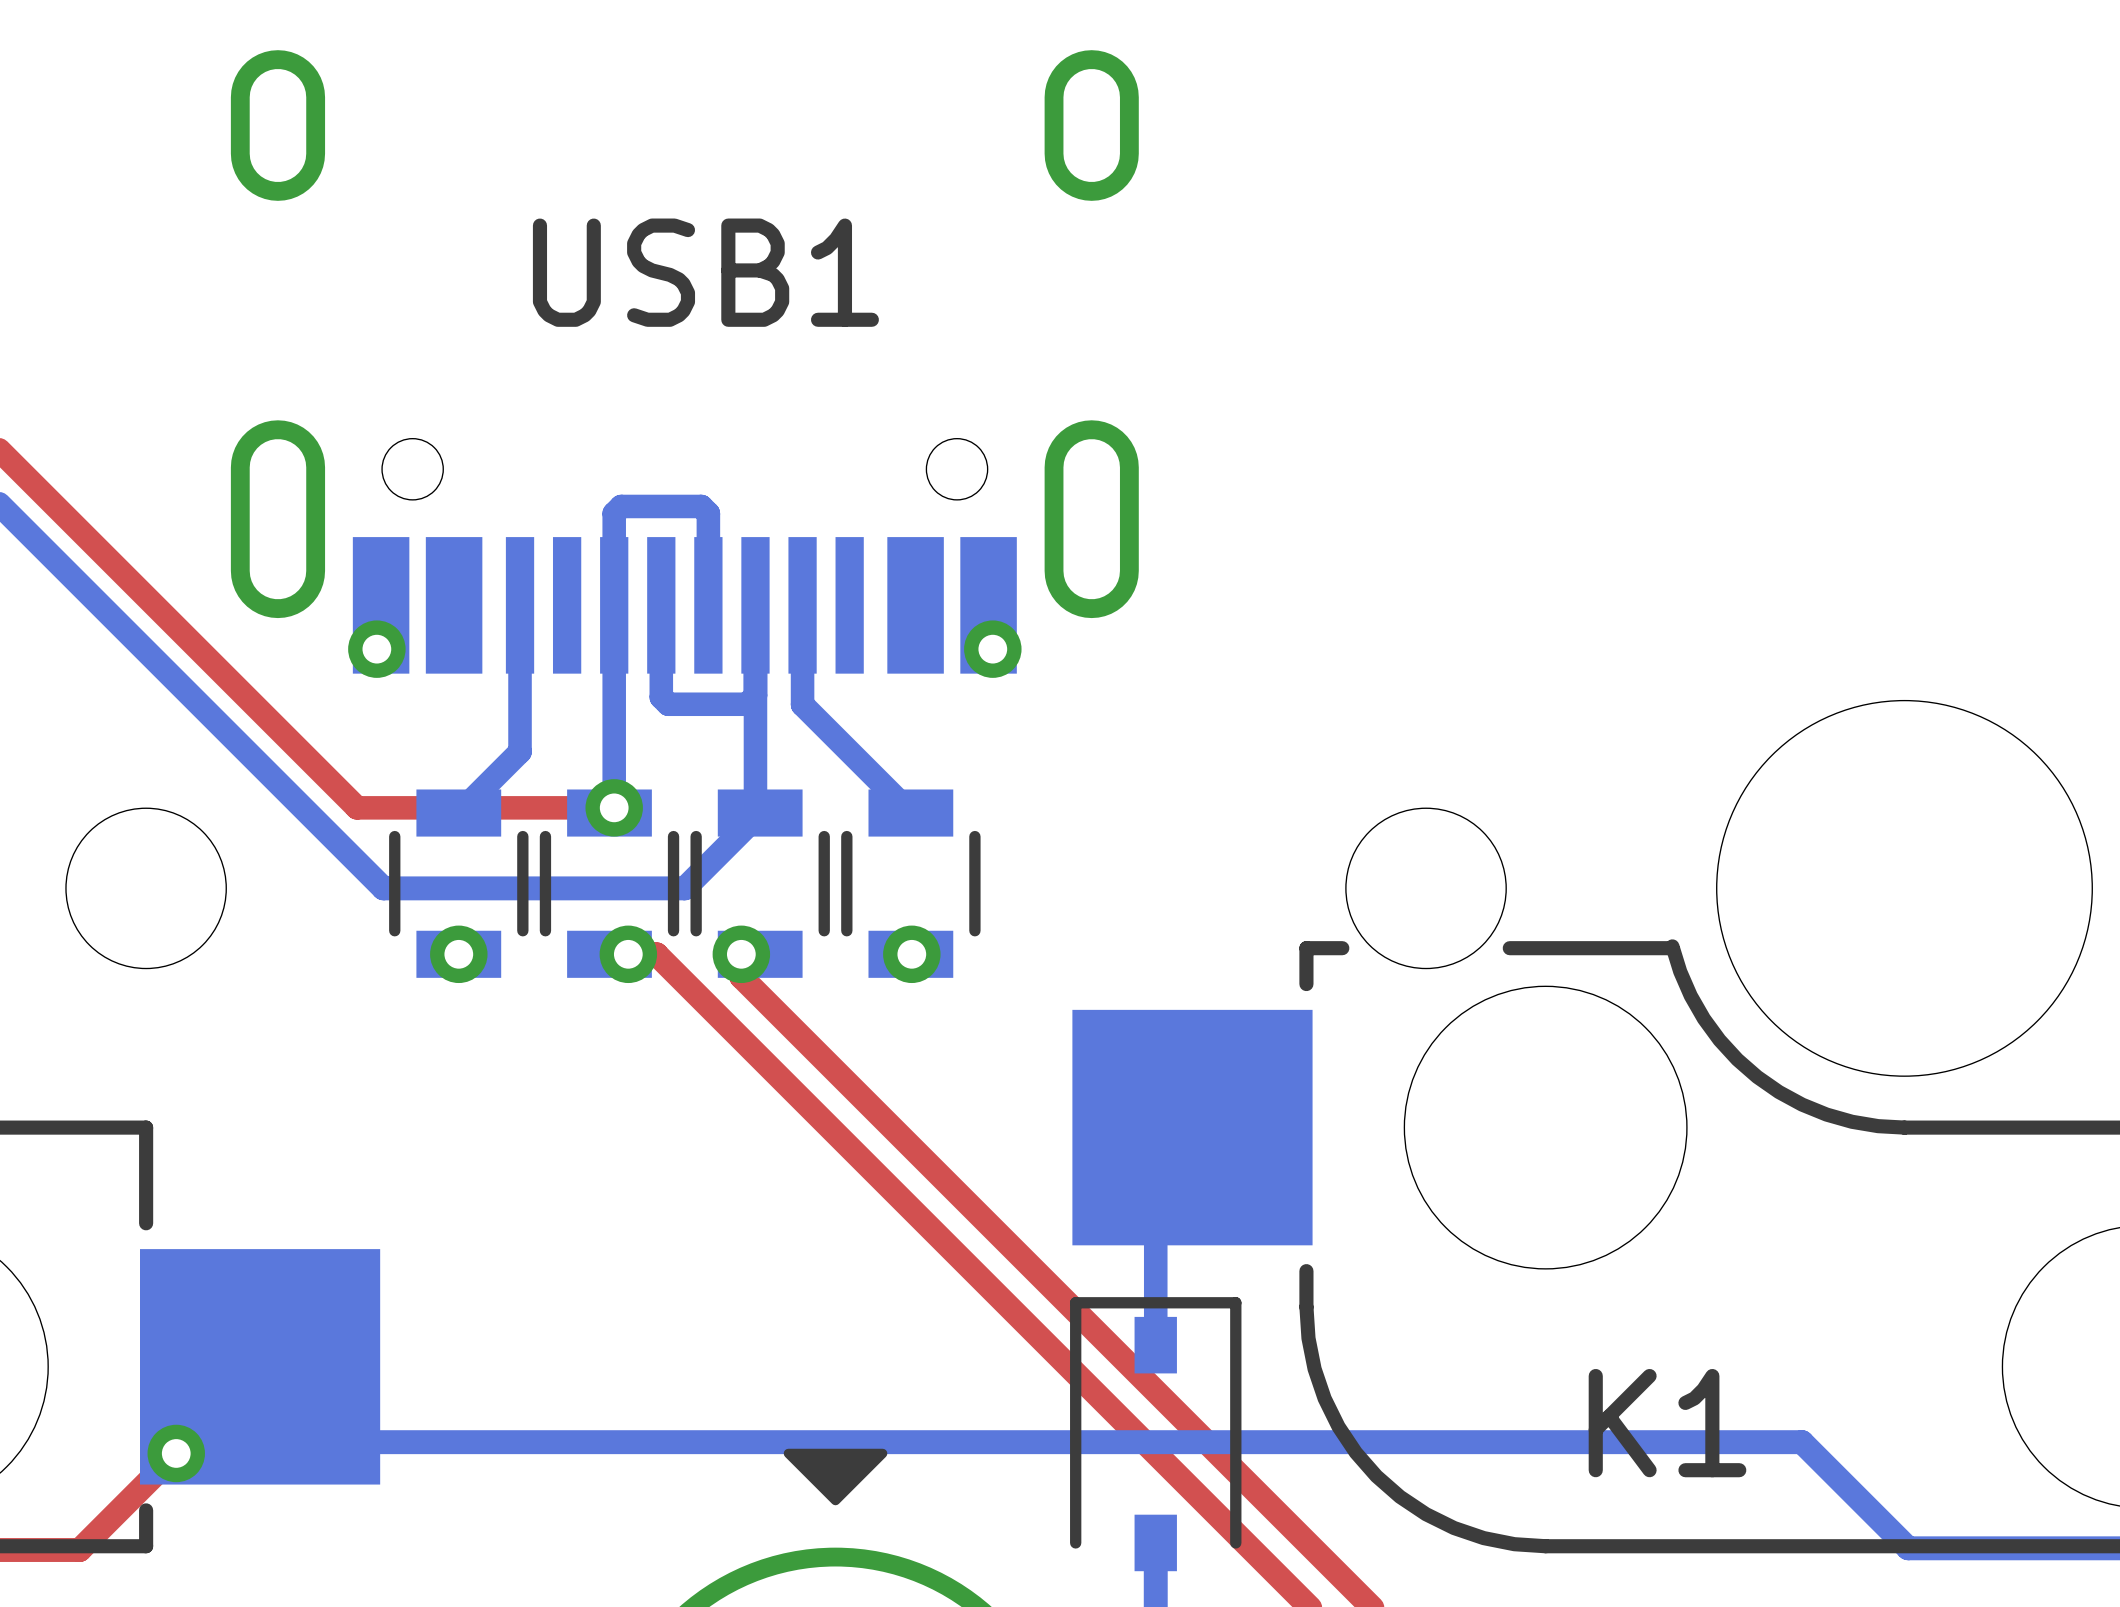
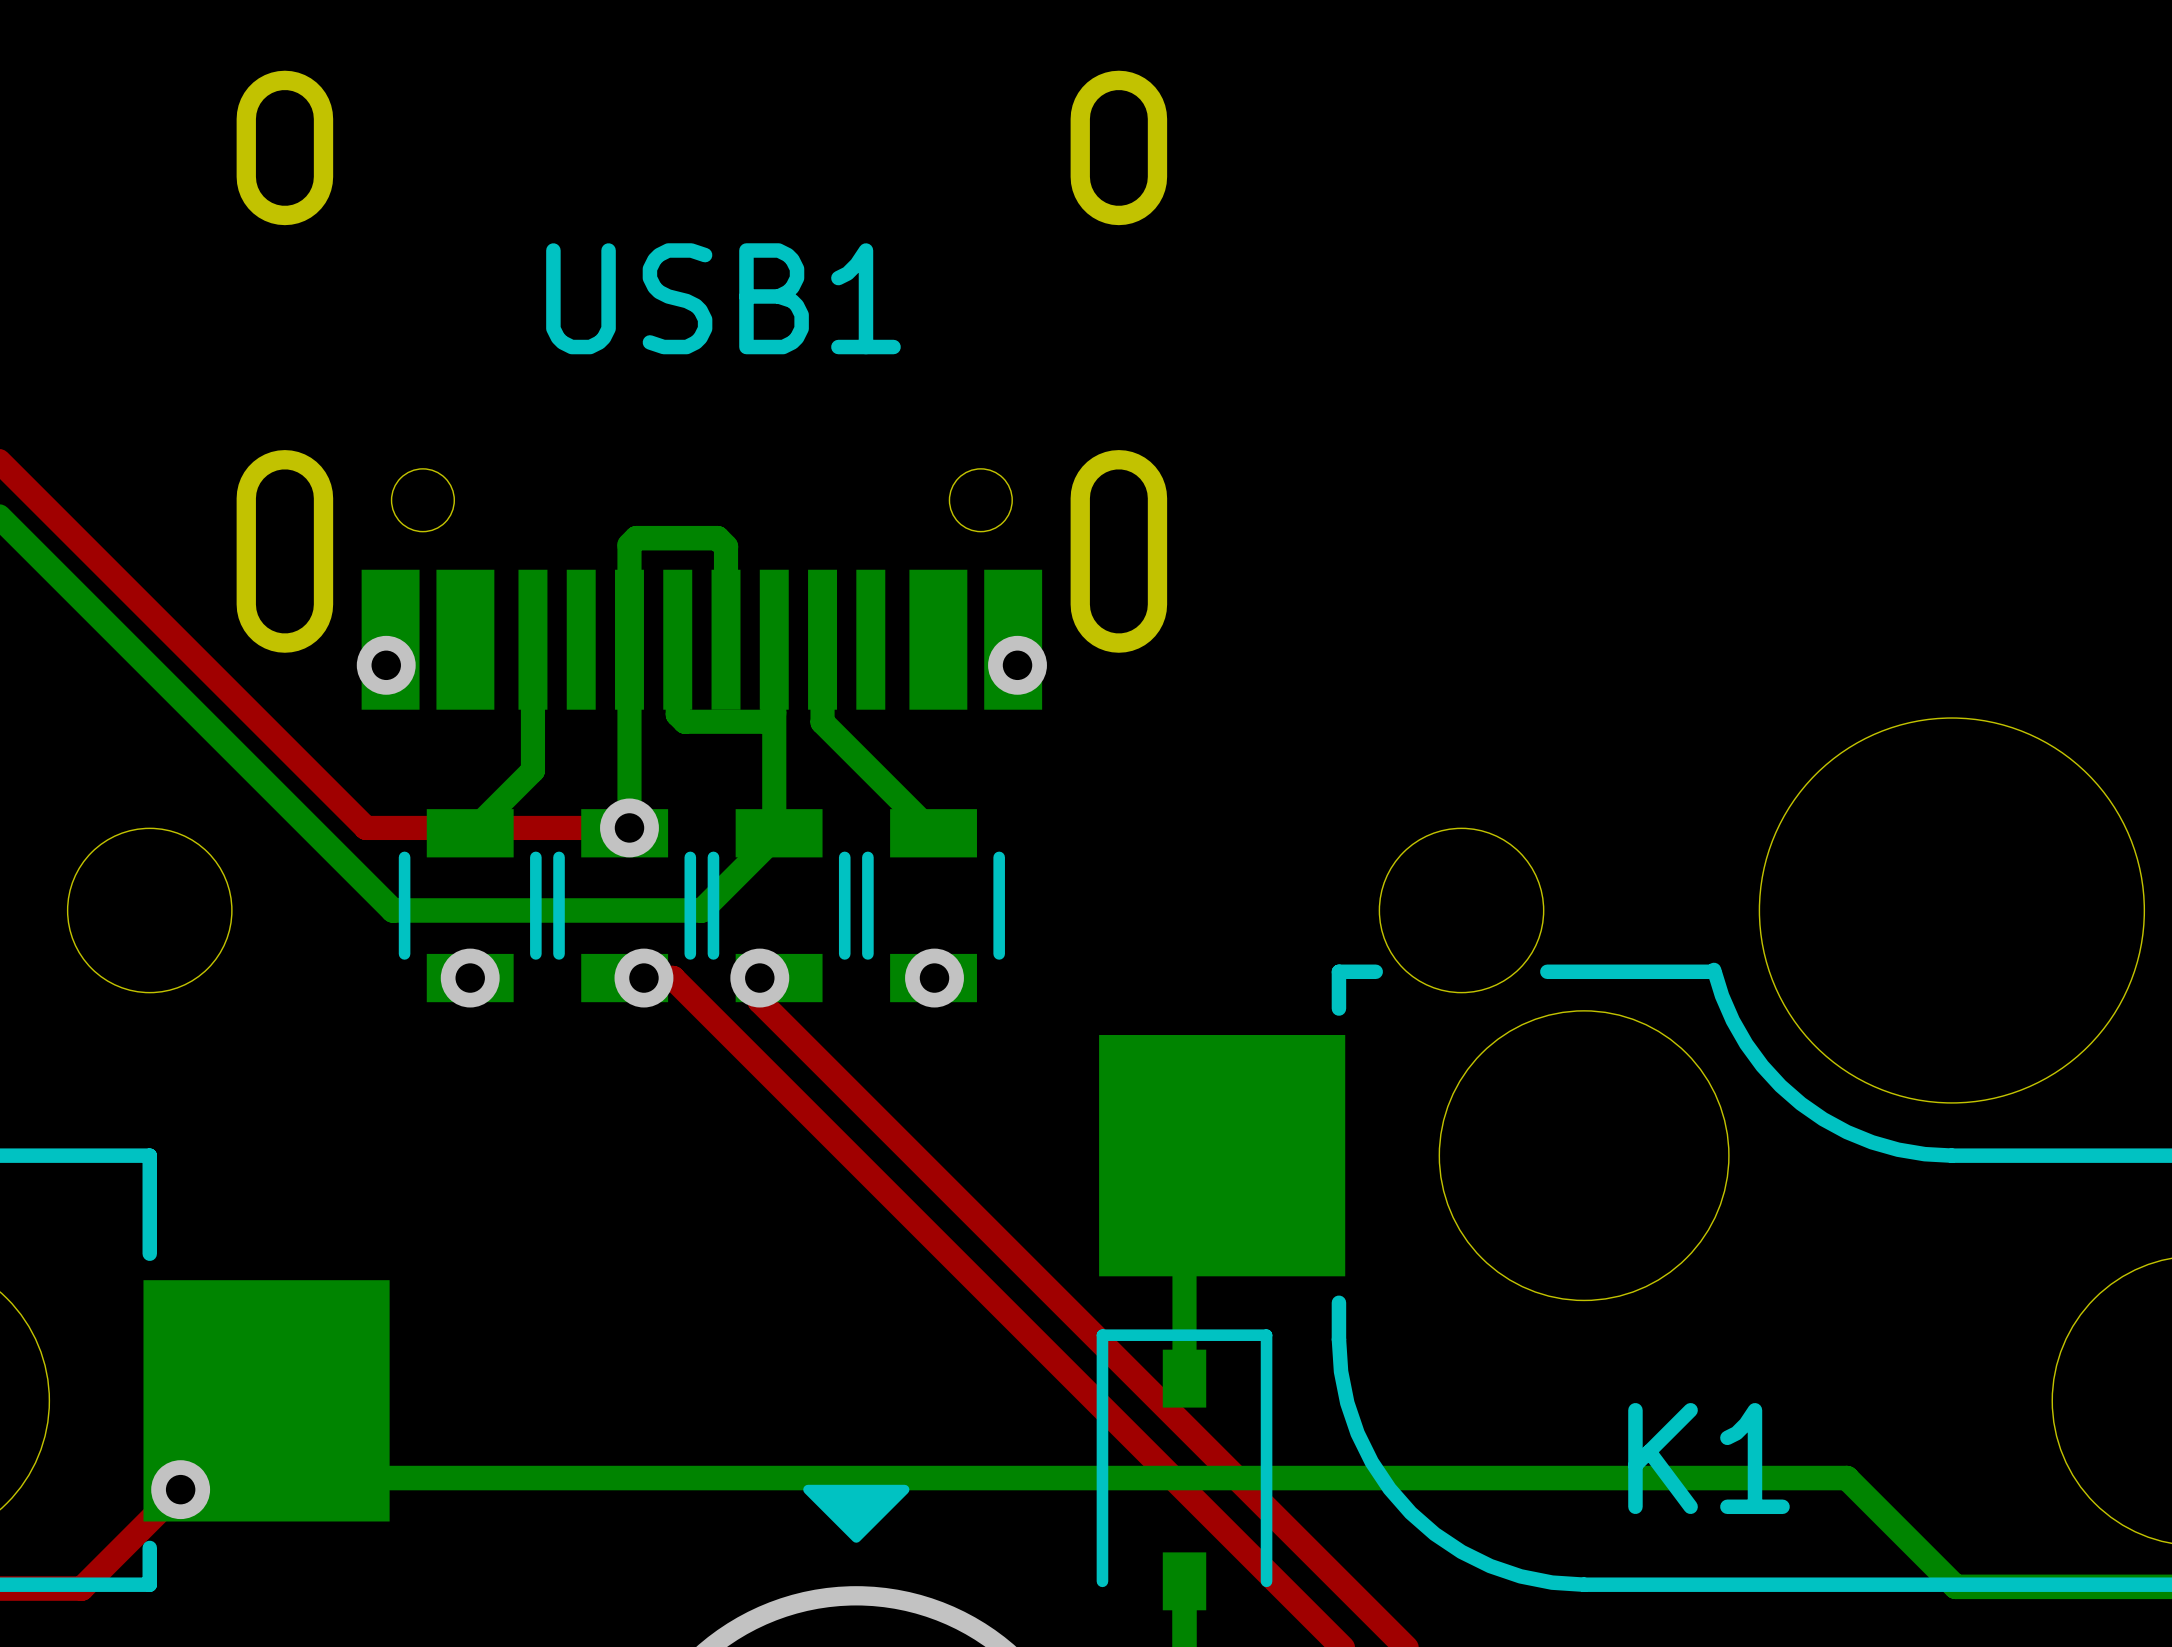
USB1 position: (684, 361) -> (701, 390)
bottom track: (614, 531) (614, 513) (621, 506) (701, 506) (708, 513) (708, 533) -> (629, 545) (636, 538) (717, 538) (726, 546)

